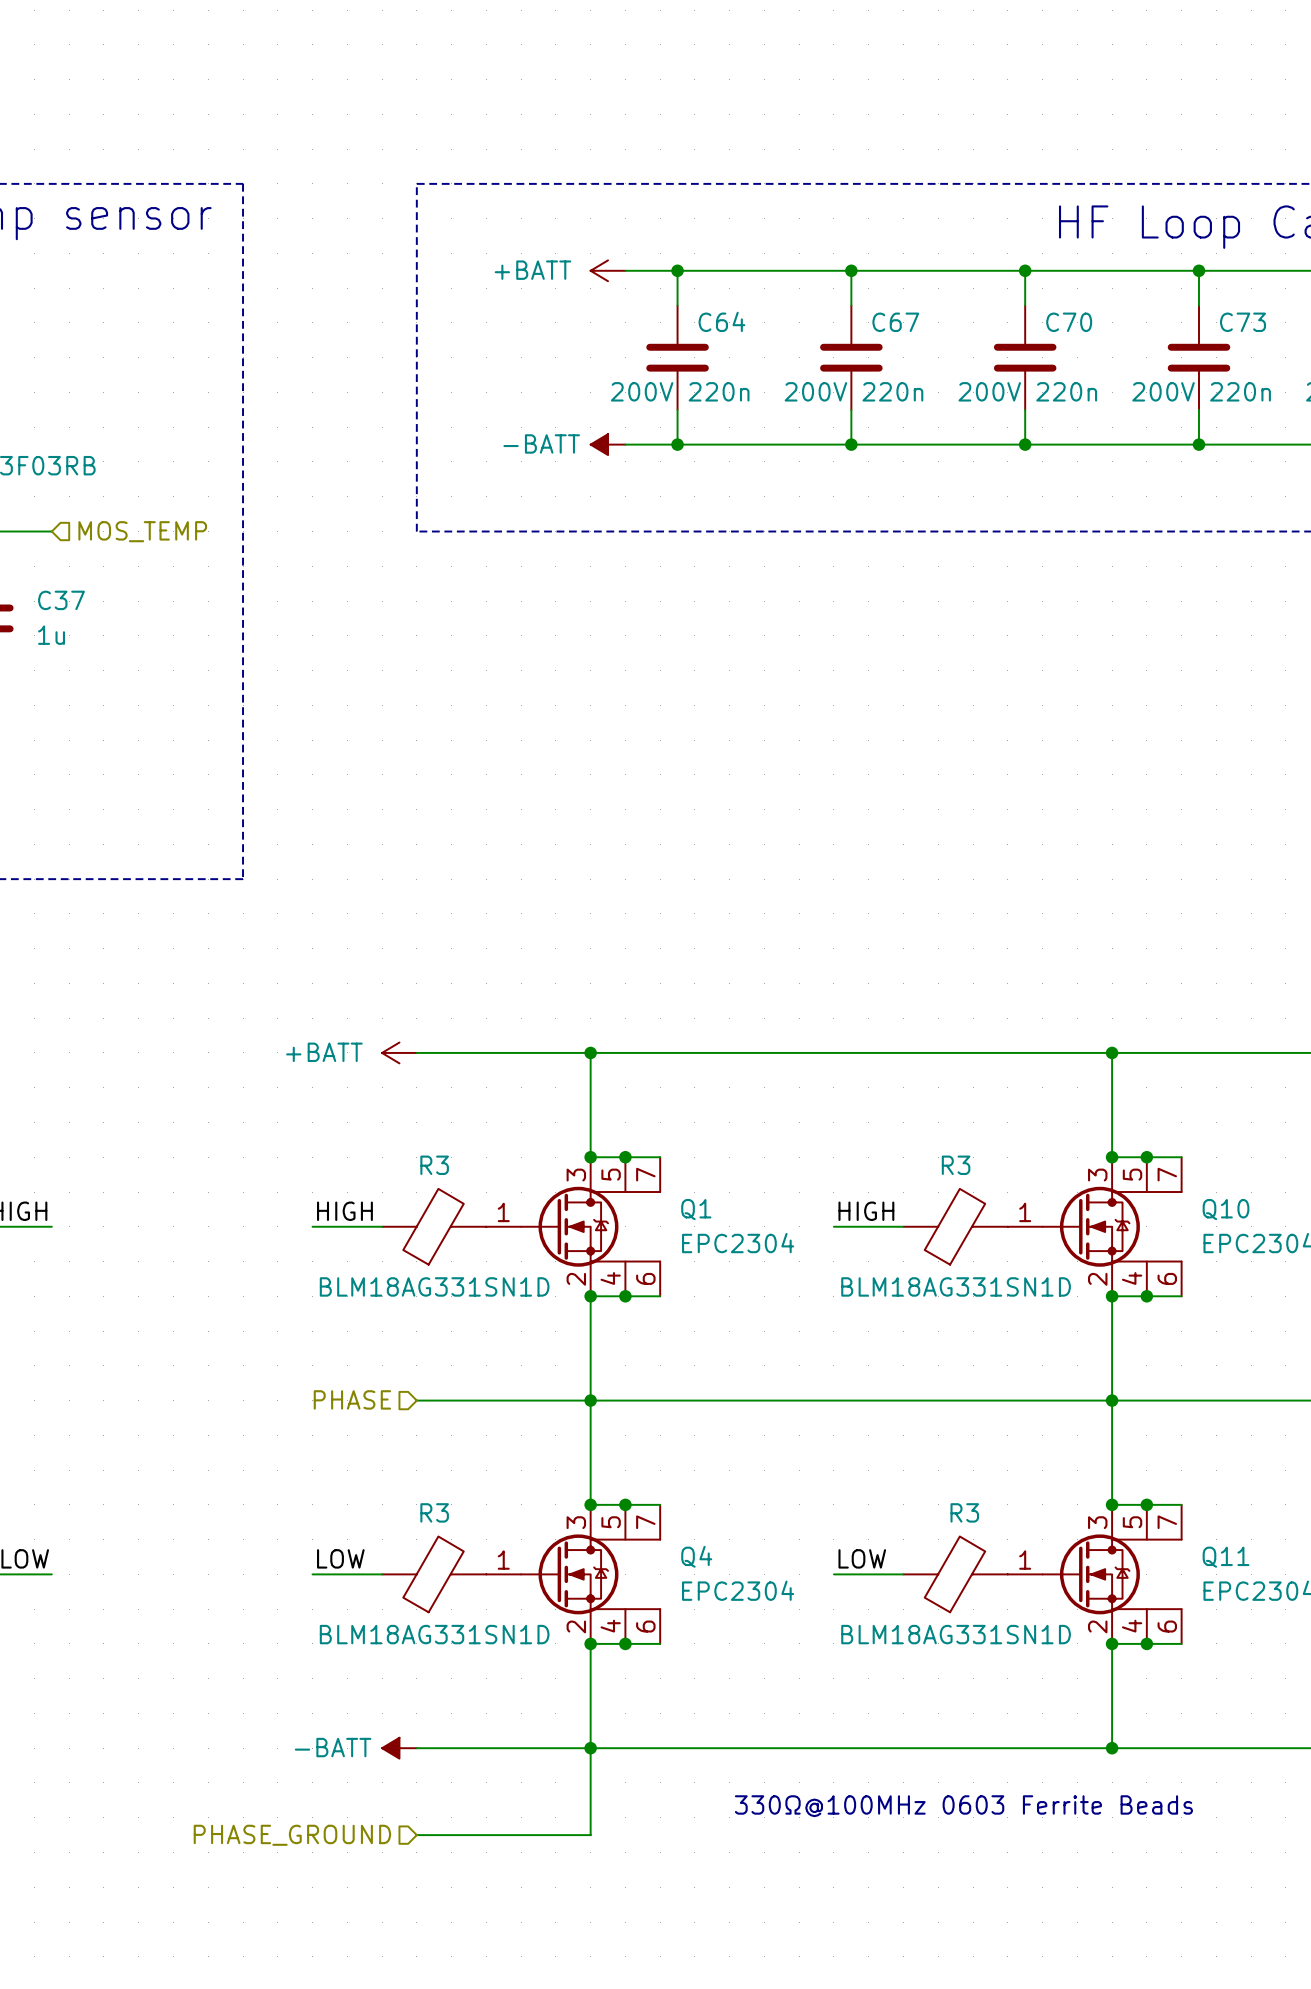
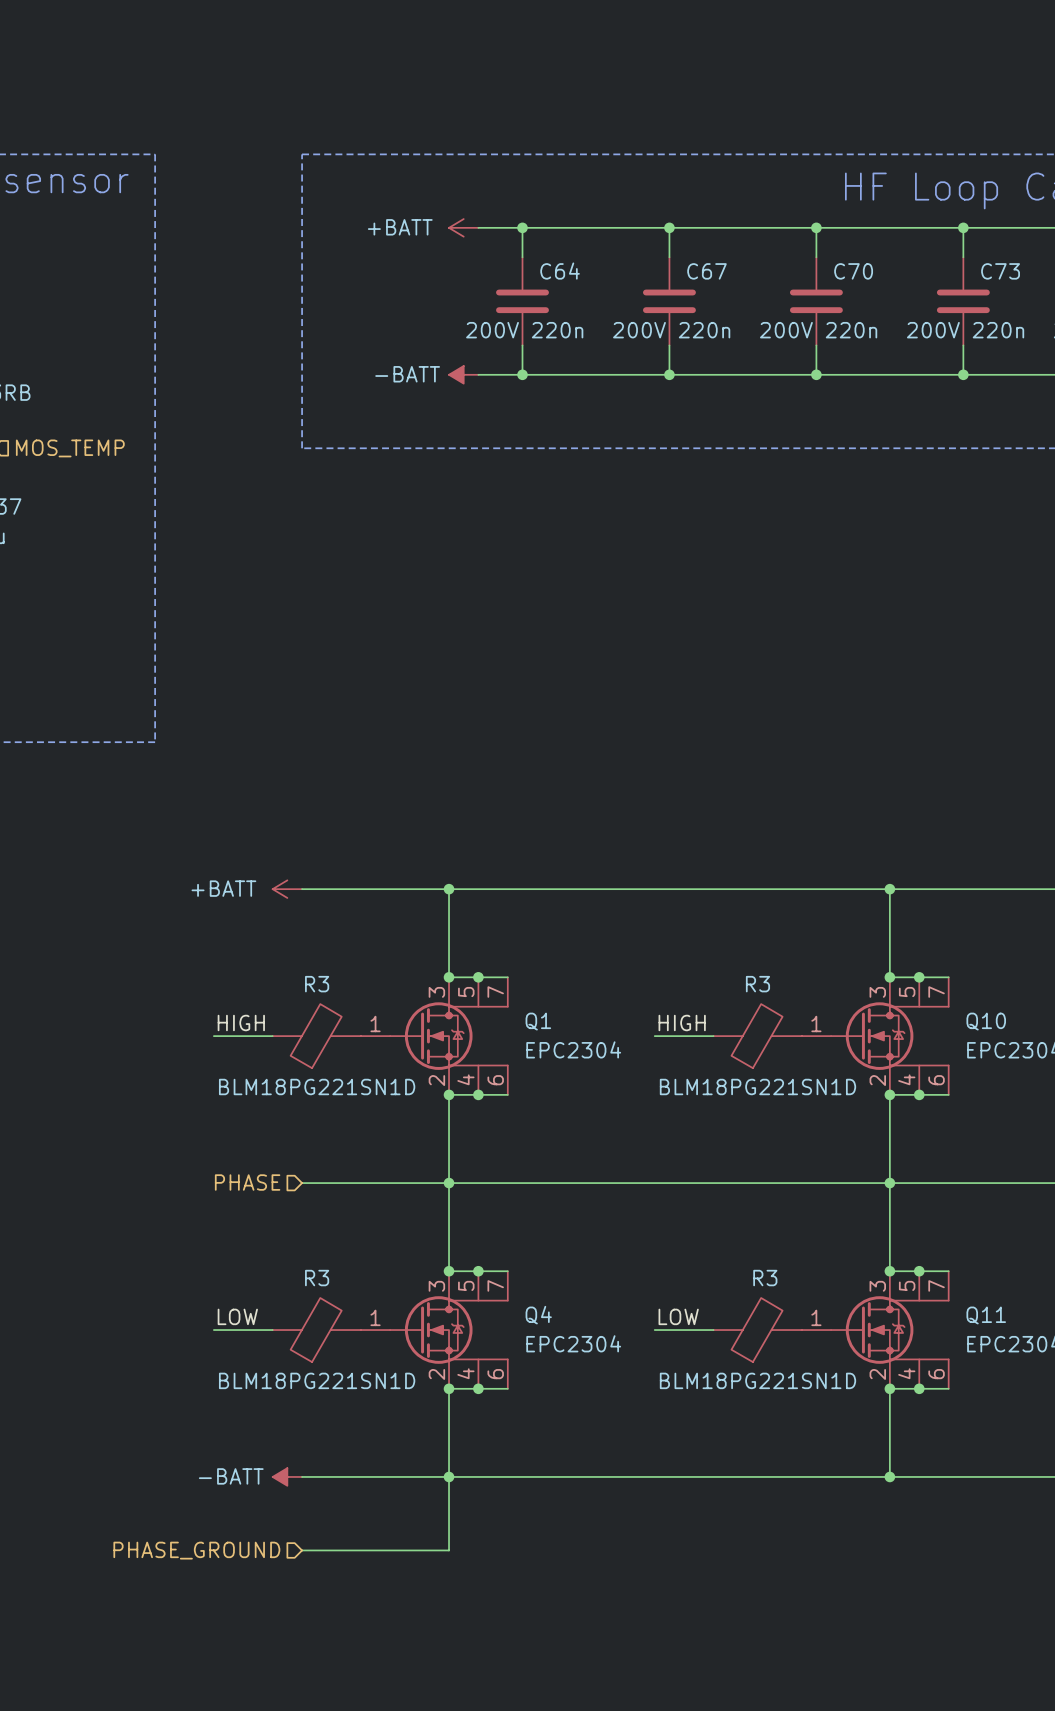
R3 value: BLM18AG331SN1D (434, 1286) -> BLM18PG221SN1D (317, 1086)
R3 value: BLM18AG331SN1D (956, 1286) -> BLM18PG221SN1D (757, 1086)
R3 value: BLM18AG331SN1D (434, 1634) -> BLM18PG221SN1D (317, 1380)
R3 value: BLM18AG331SN1D (956, 1634) -> BLM18PG221SN1D (757, 1380)
text: 330Ω@100MHz 0603 Ferrite Beads (963, 1806) -> none

